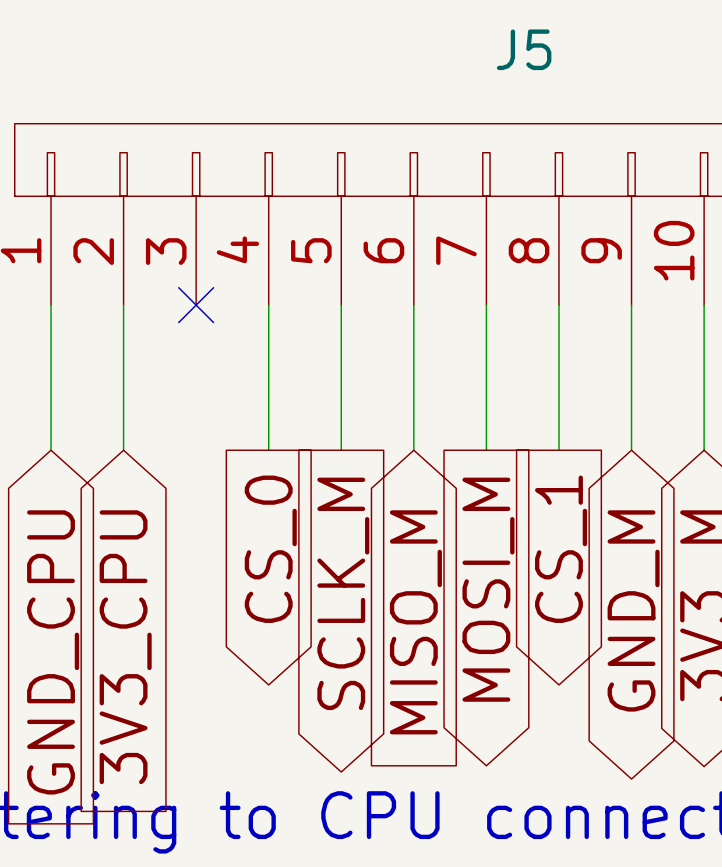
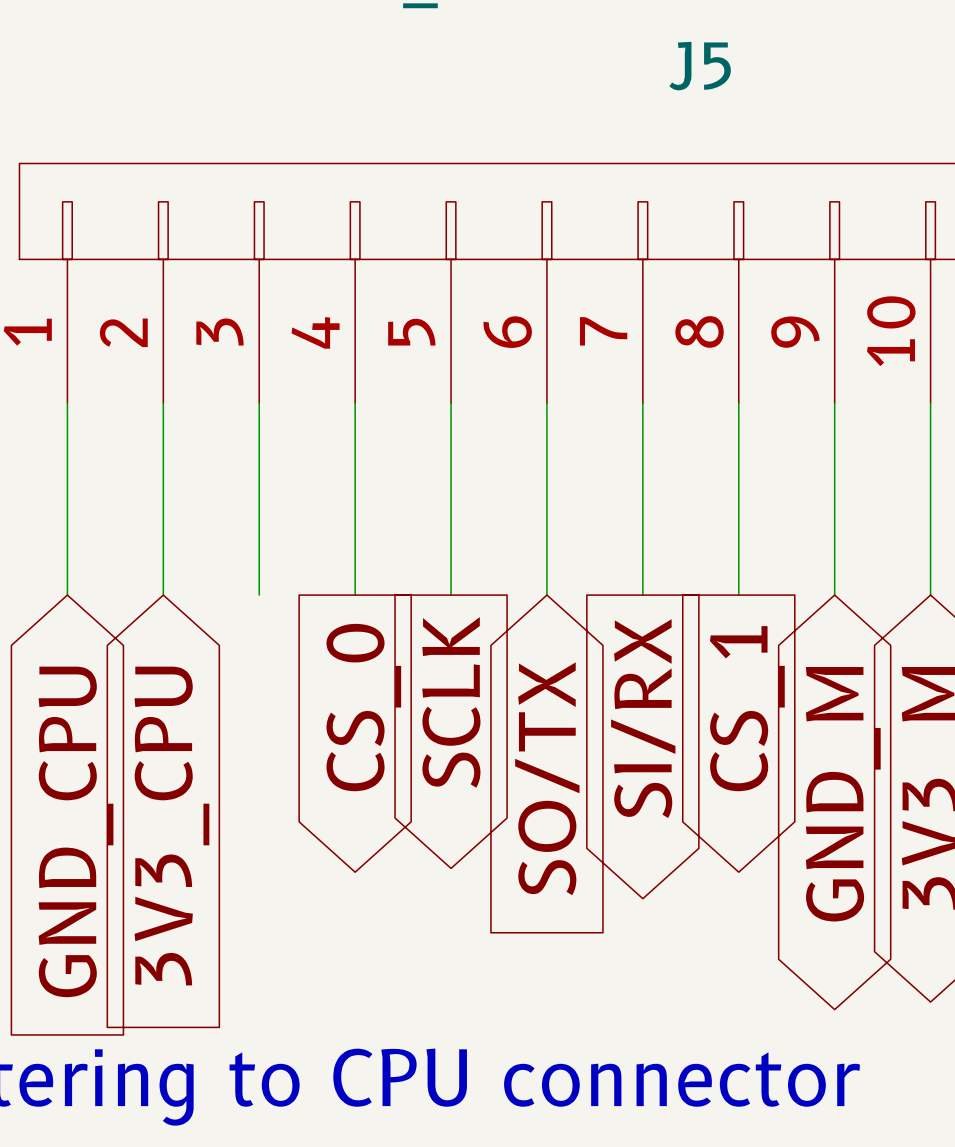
wire: none -> (259, 403) (259, 595)
no-connect mark: (196, 305) -> none
global label: MOSI_M (488, 589) -> SI/RX (643, 718)
global label: SCLK_M (343, 593) -> SCLK (451, 702)
global label: MISO_M (415, 622) -> SO/TX (547, 778)

